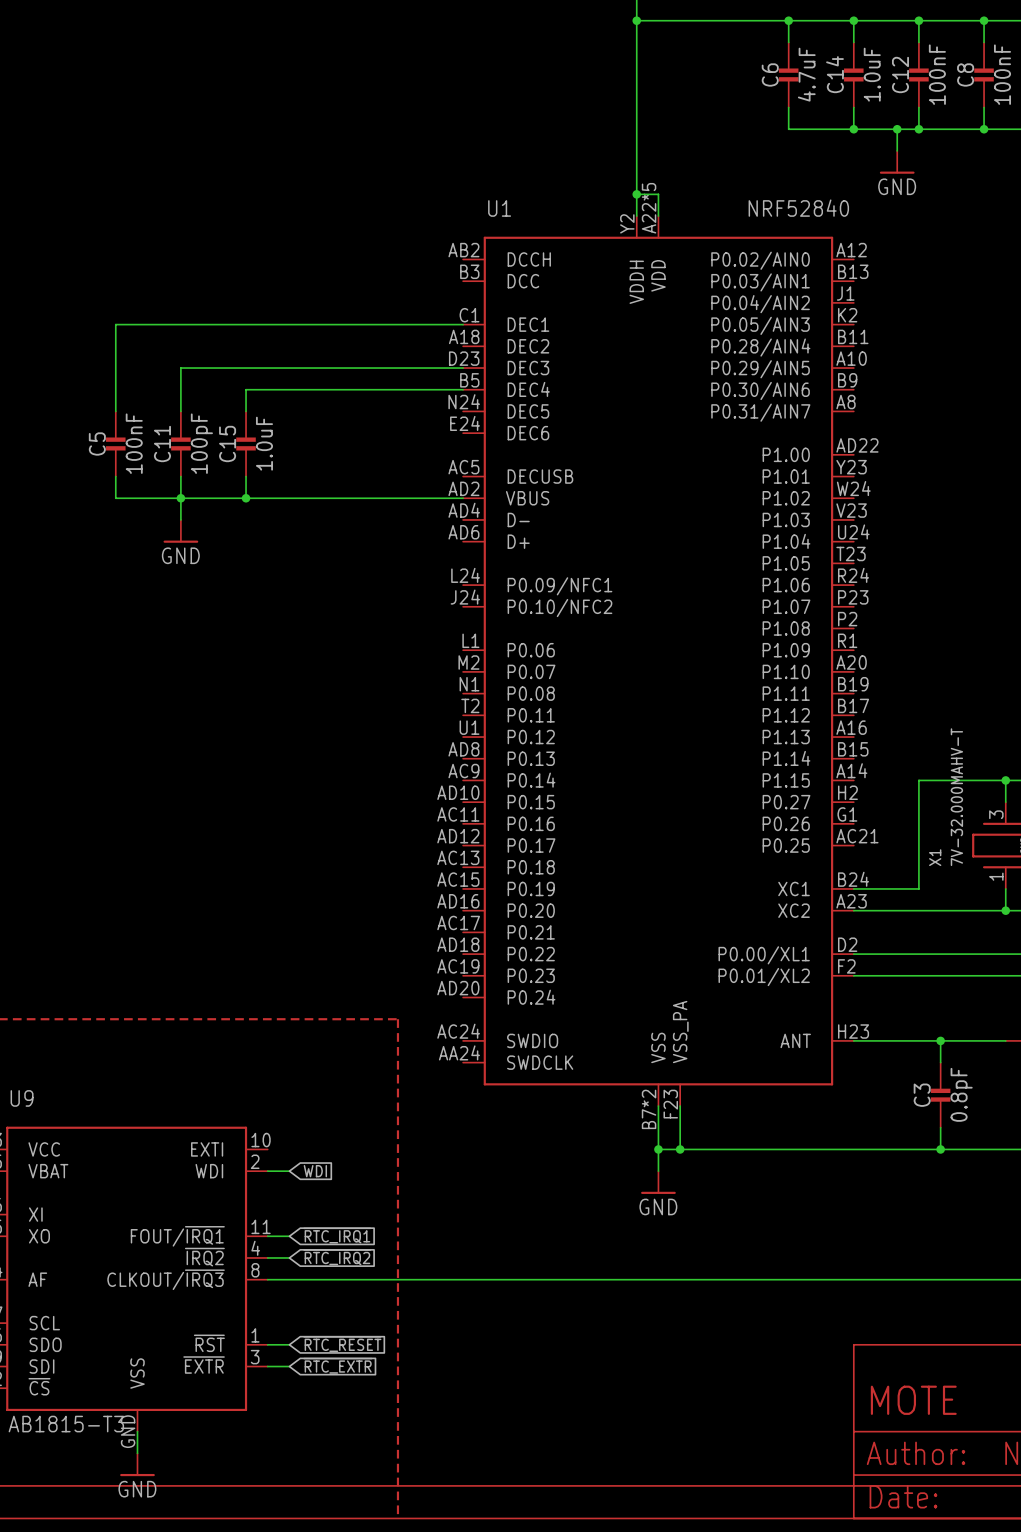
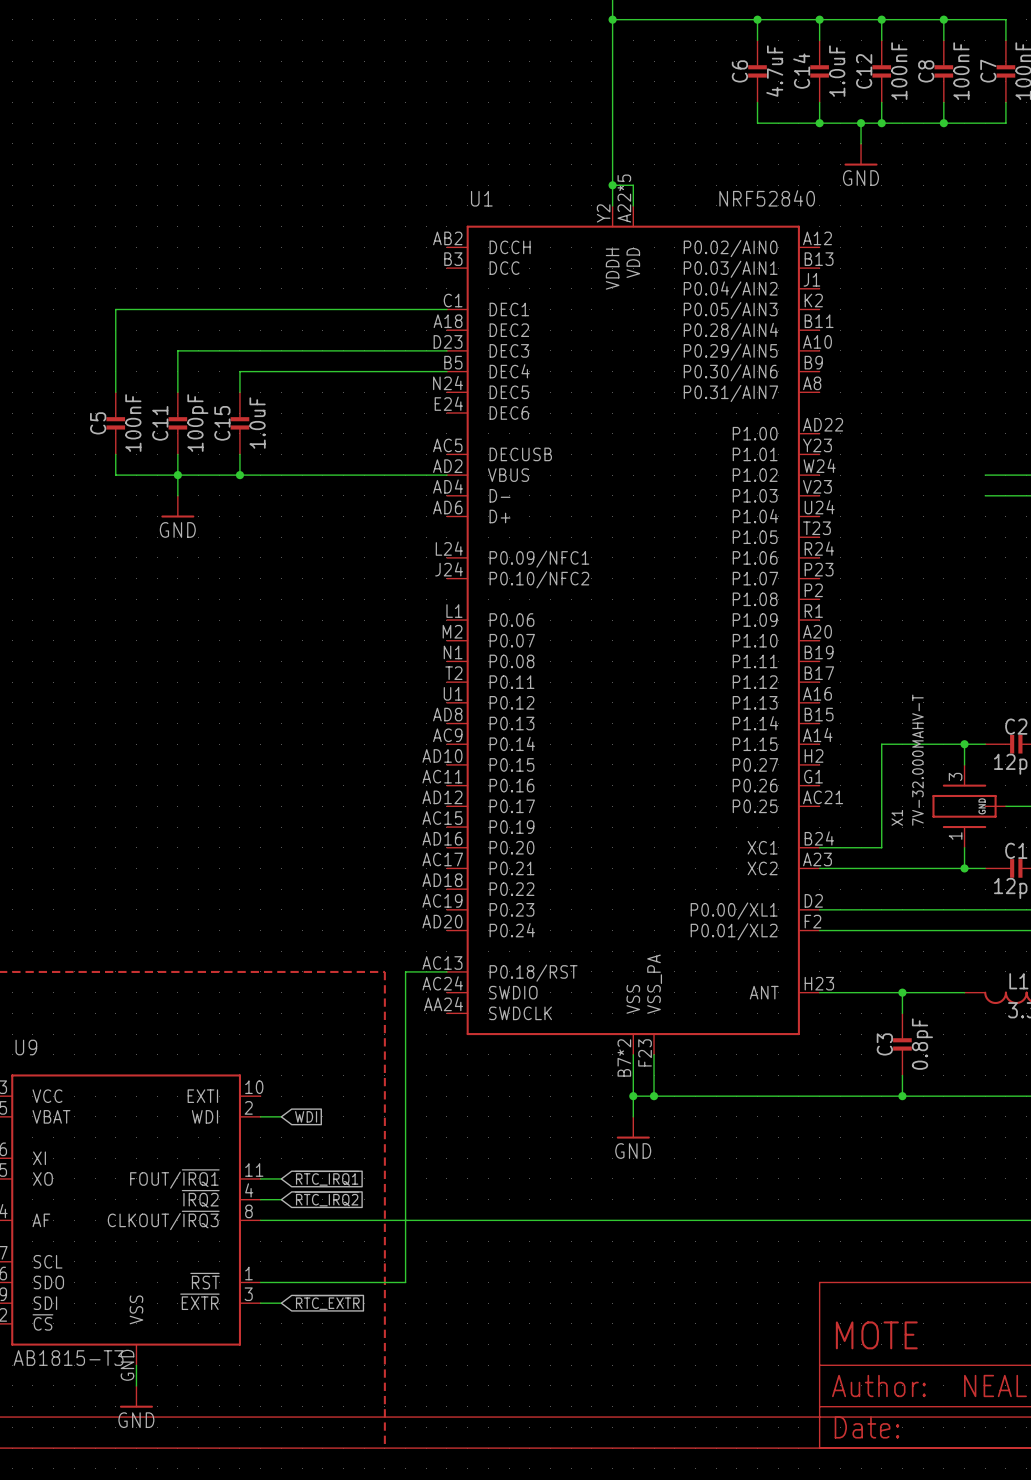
U1 symbol: [463, 216, 854, 1107] -> [446, 205, 820, 1055]
wire: none -> (446, 971) (405, 971) (405, 1282) (281, 1282)
global label: ~{RTC_RESET} (342, 1344) -> none

